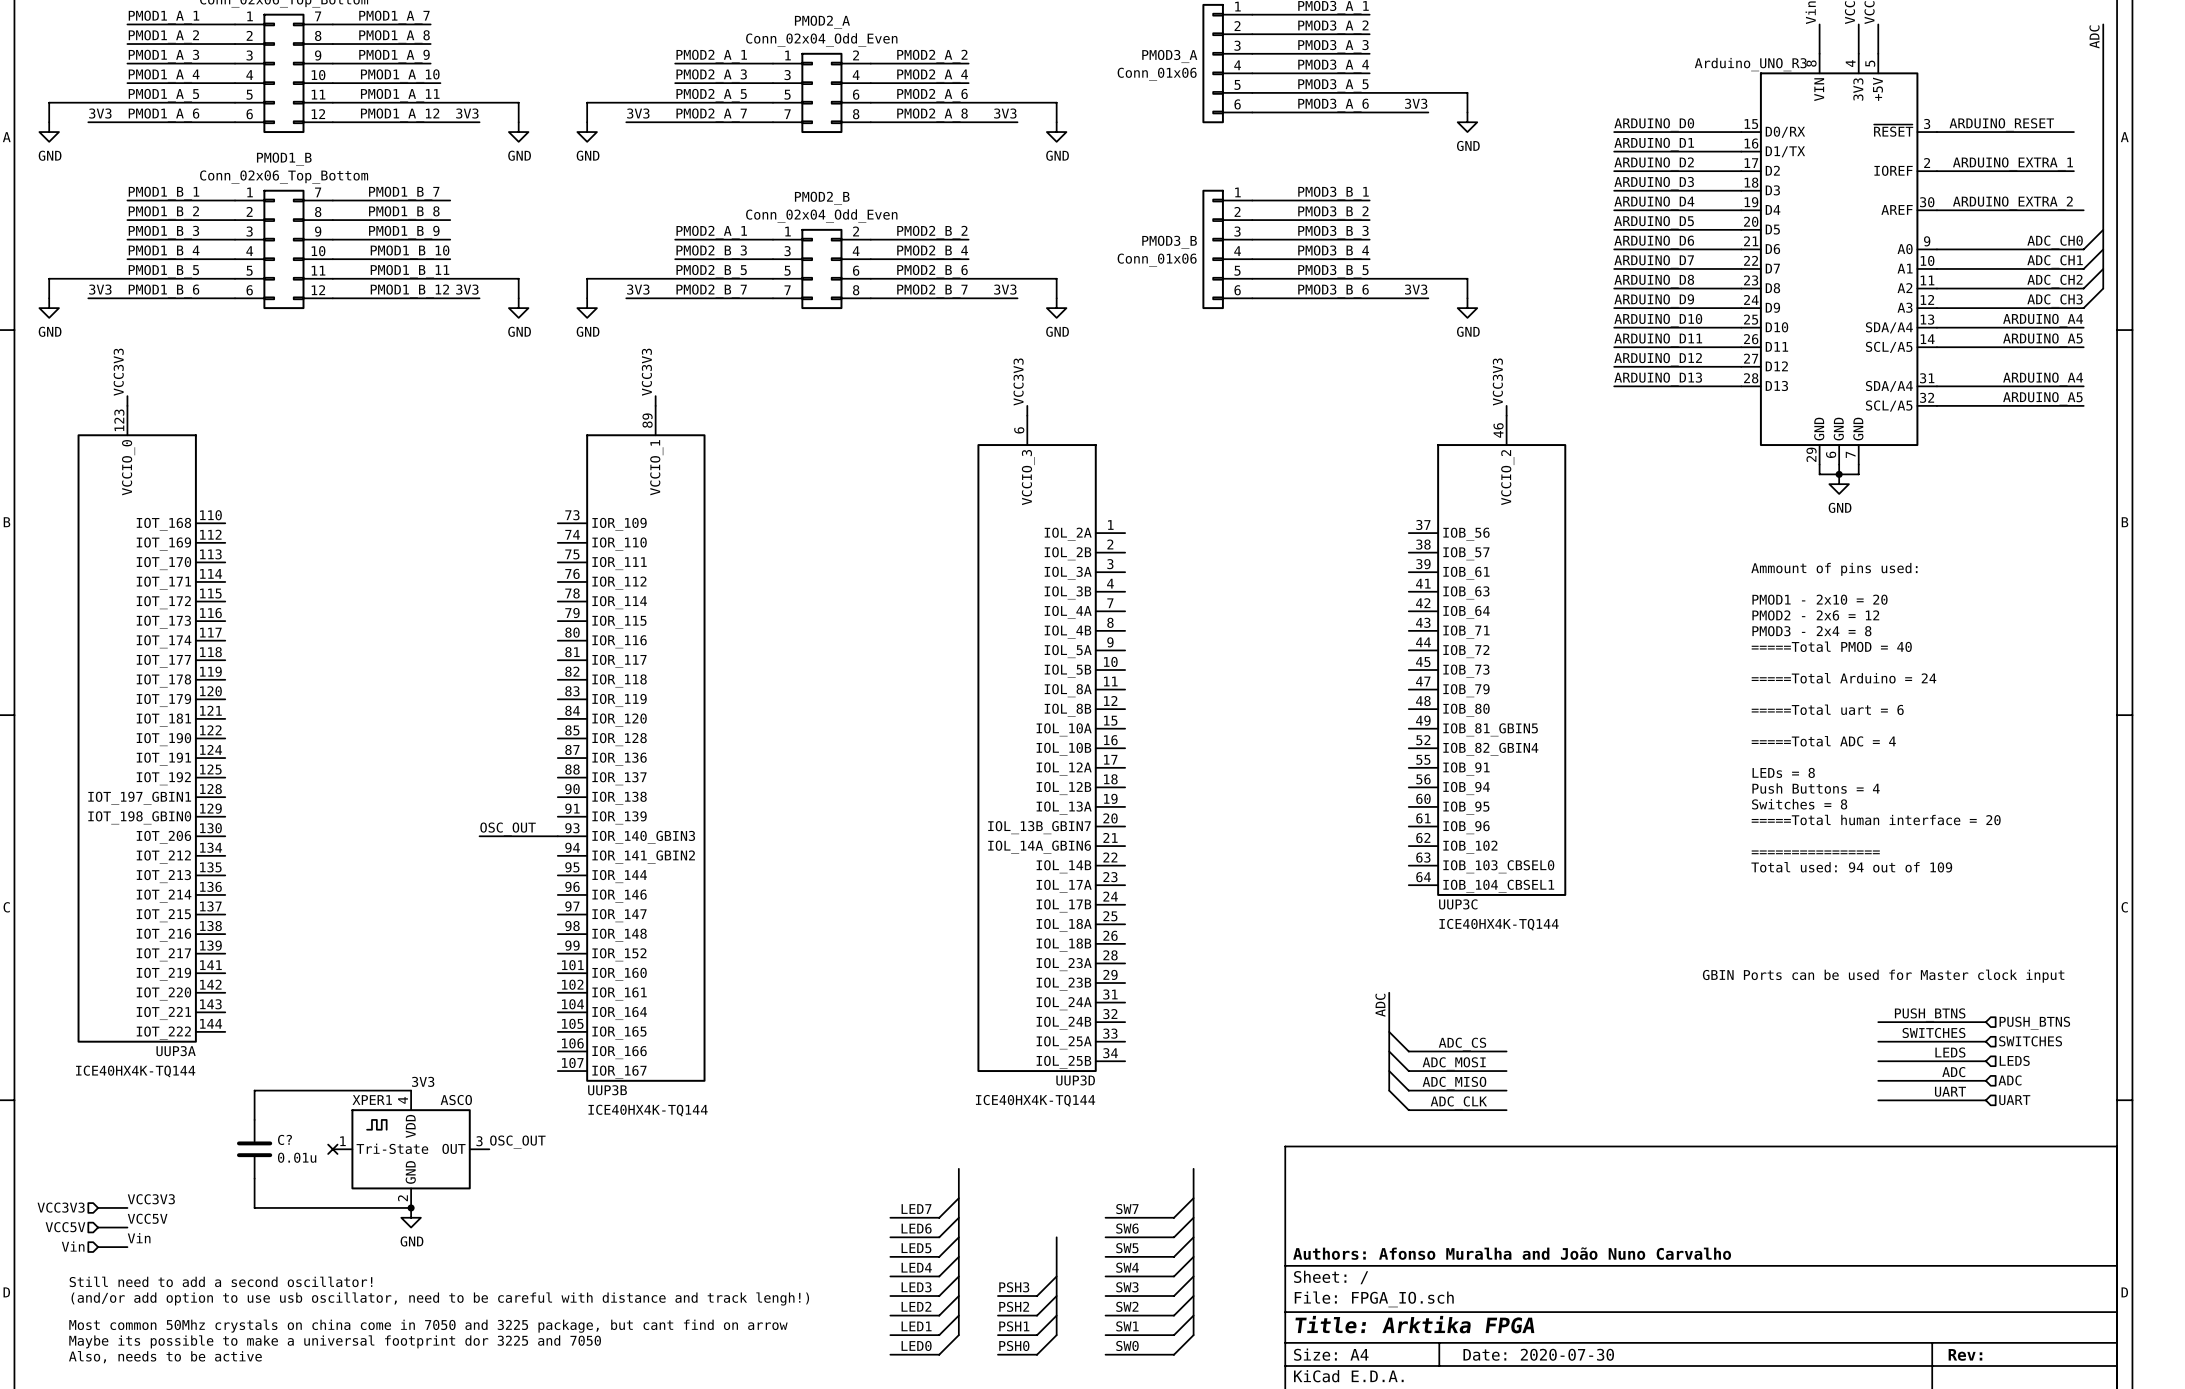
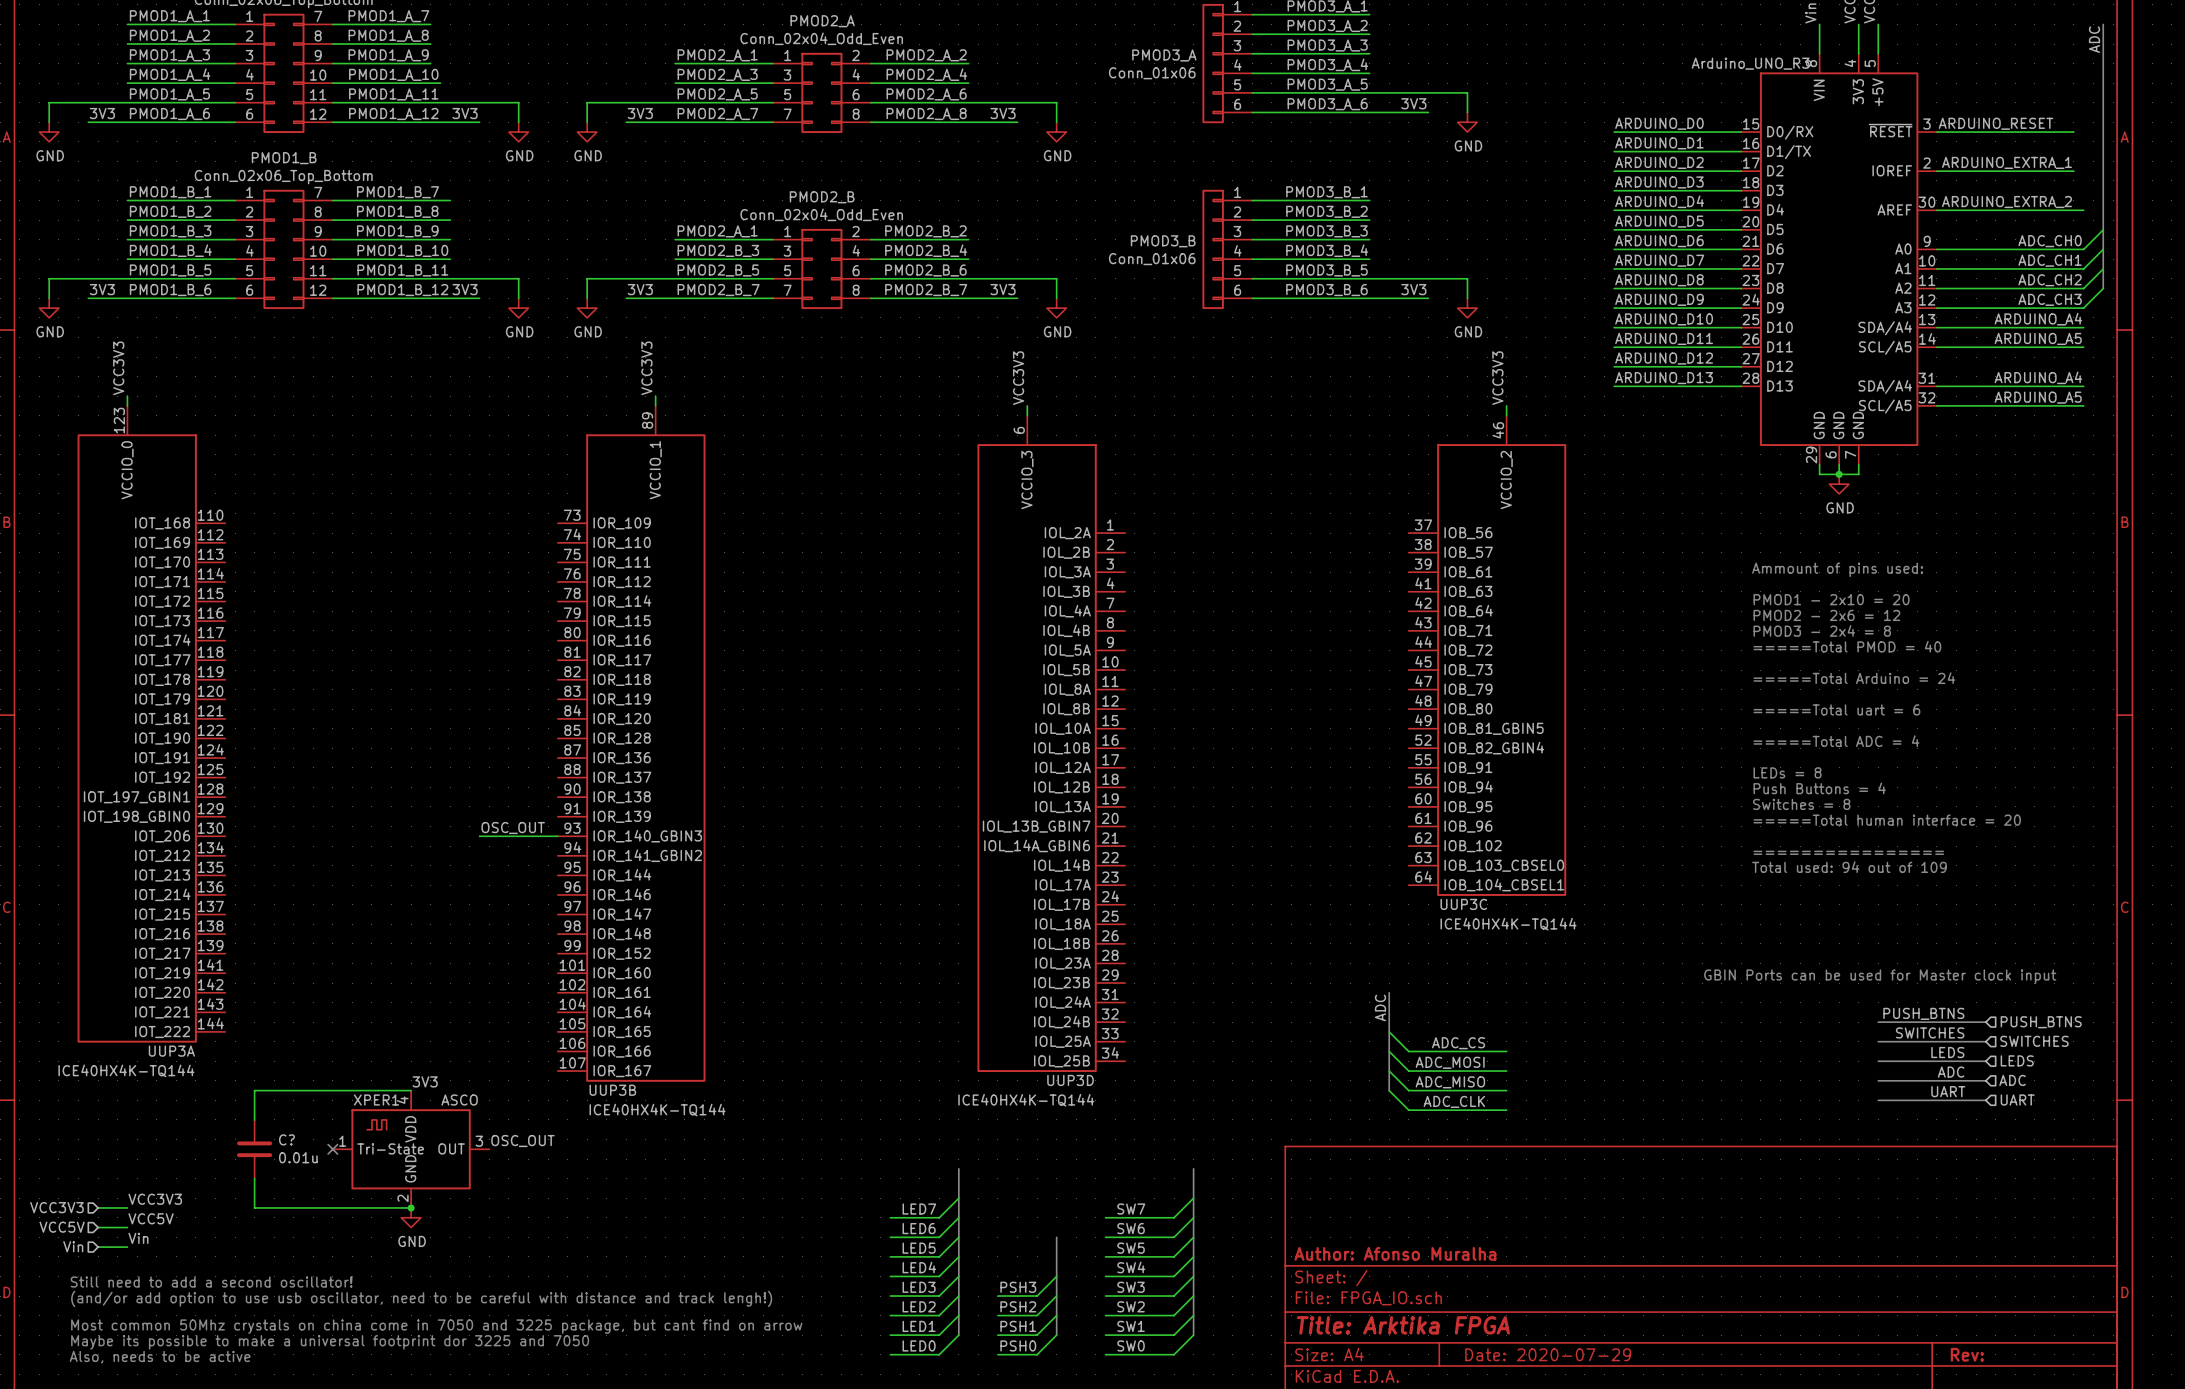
title block: Authors: Afonso Muralha and João Nuno Carvalho (1512, 1253) -> Author: Afonso Muralha (1395, 1253)
title block: Date: 2020-07-30 (1538, 1354) -> Date: 2020-07-29 (1548, 1354)

